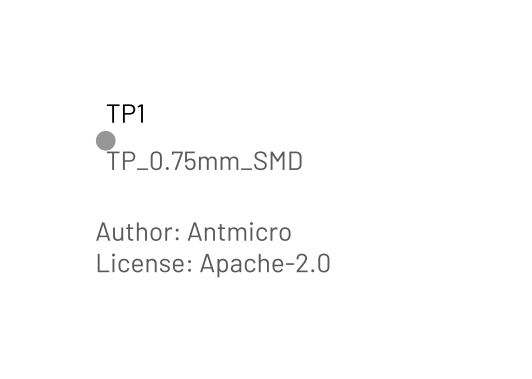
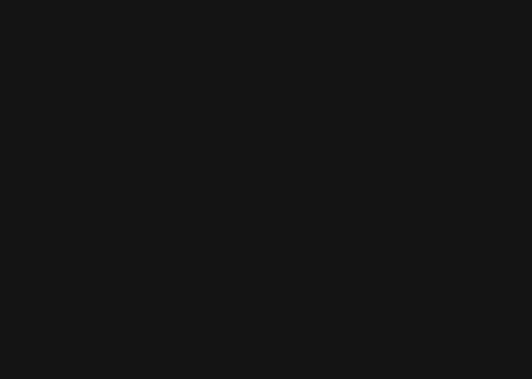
TP1: TP_0.75mm_SMD (105, 140) -> none

